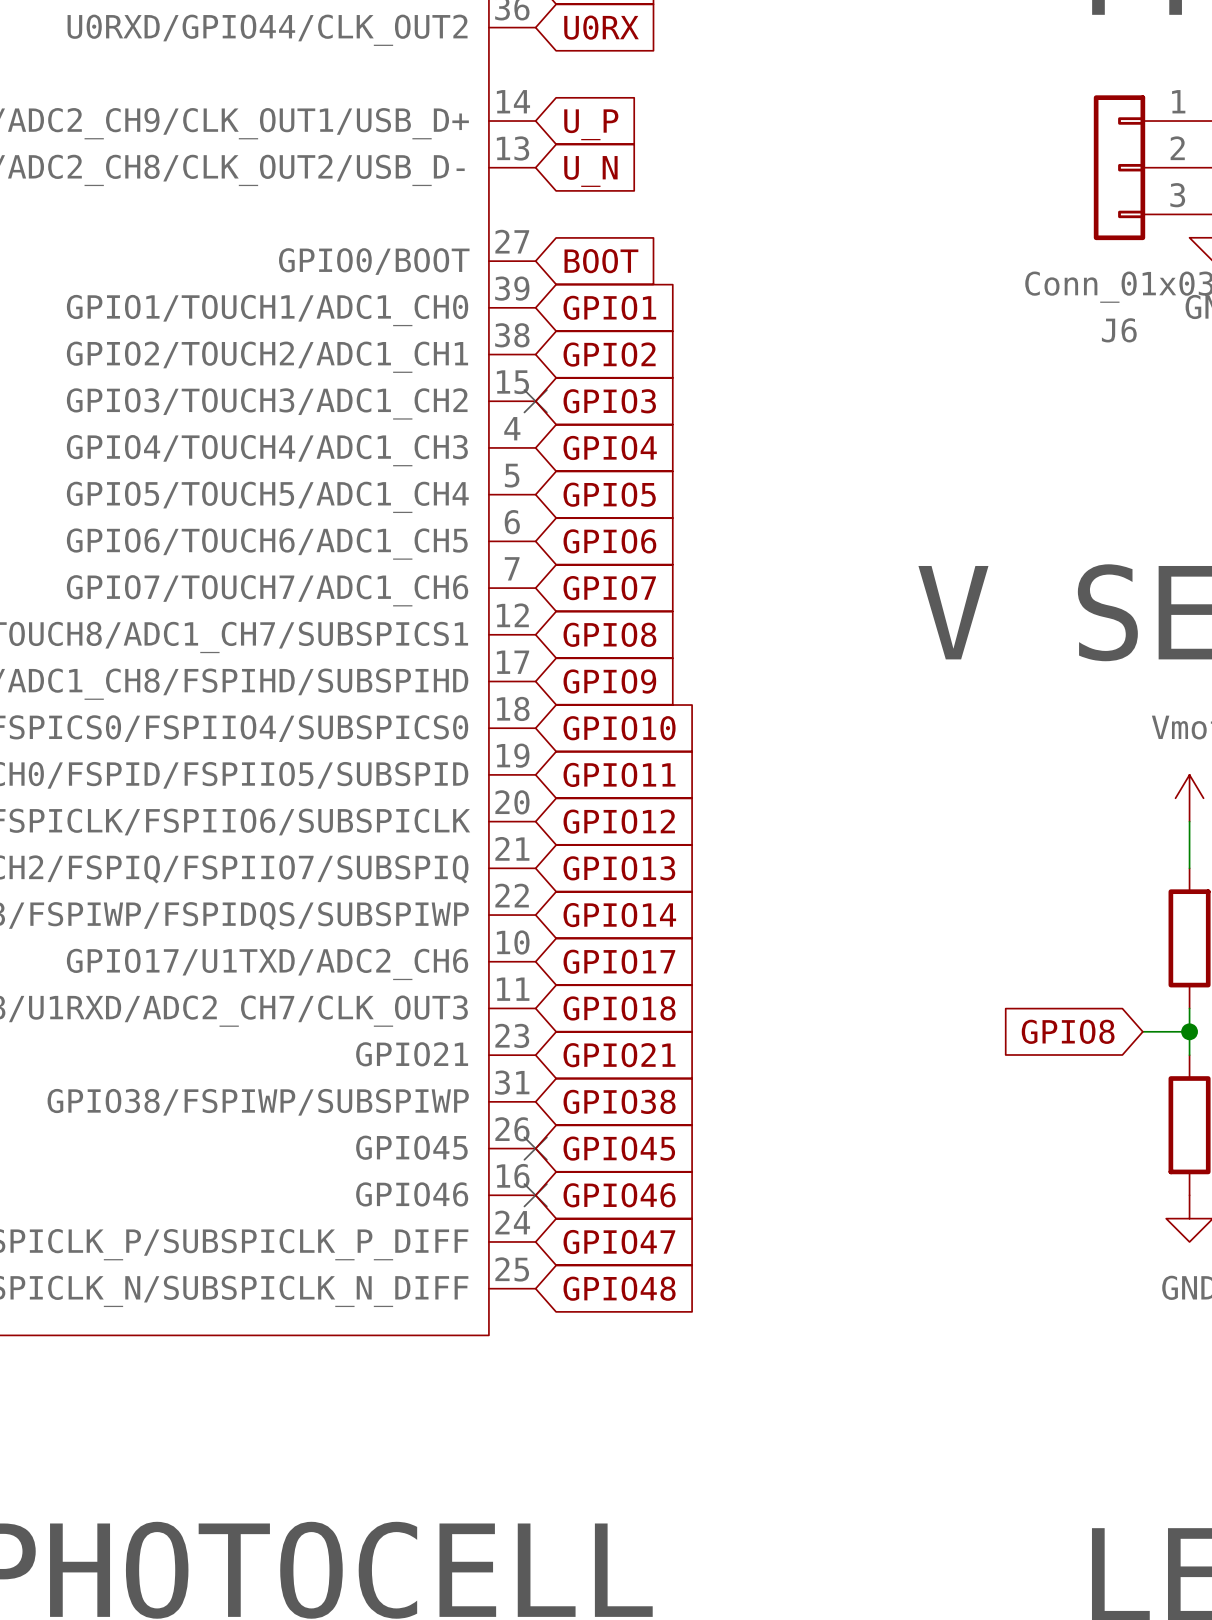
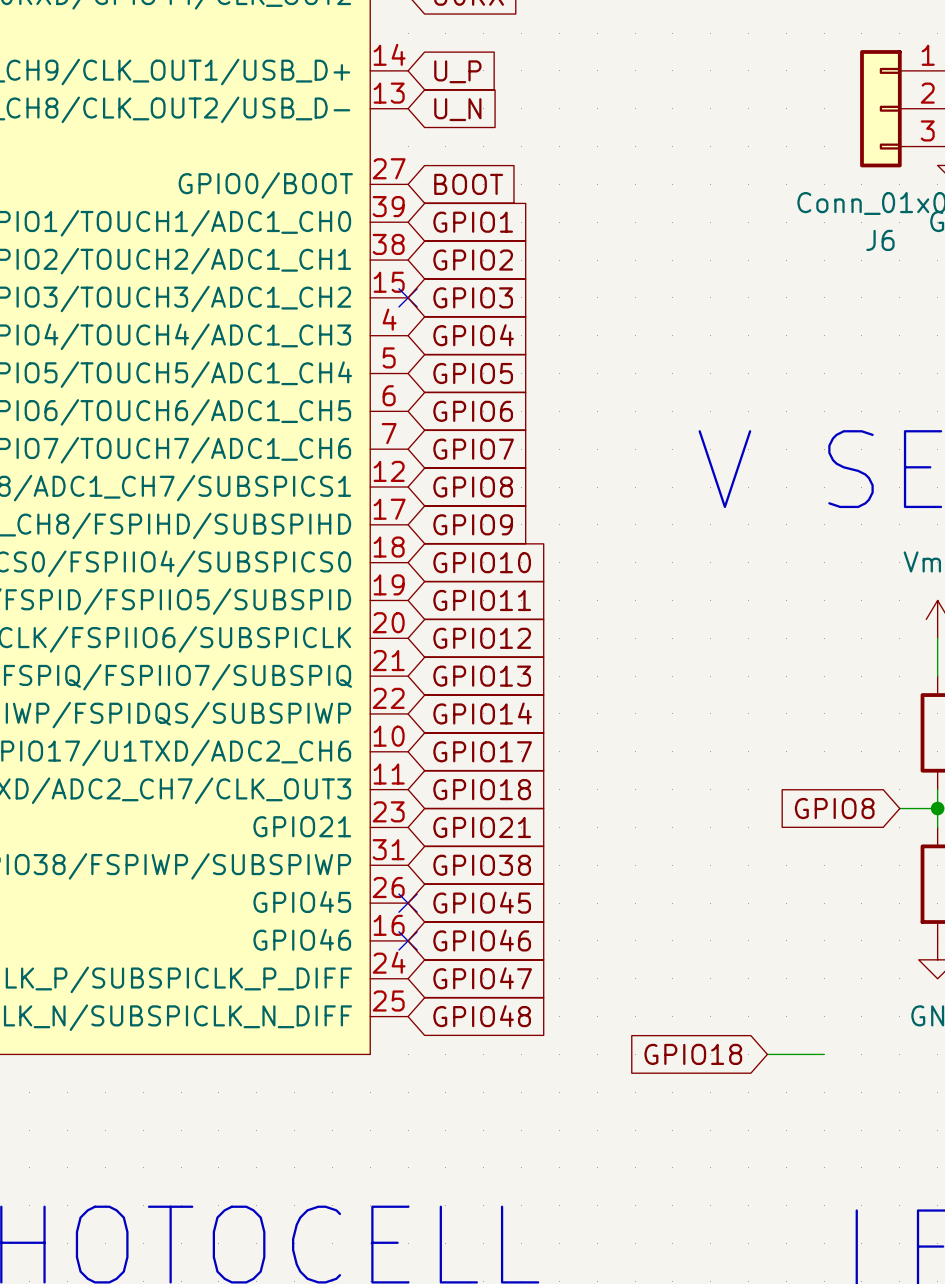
global label: none -> GPIO18 (693, 1054)
wire: none -> (767, 1054) (824, 1054)

